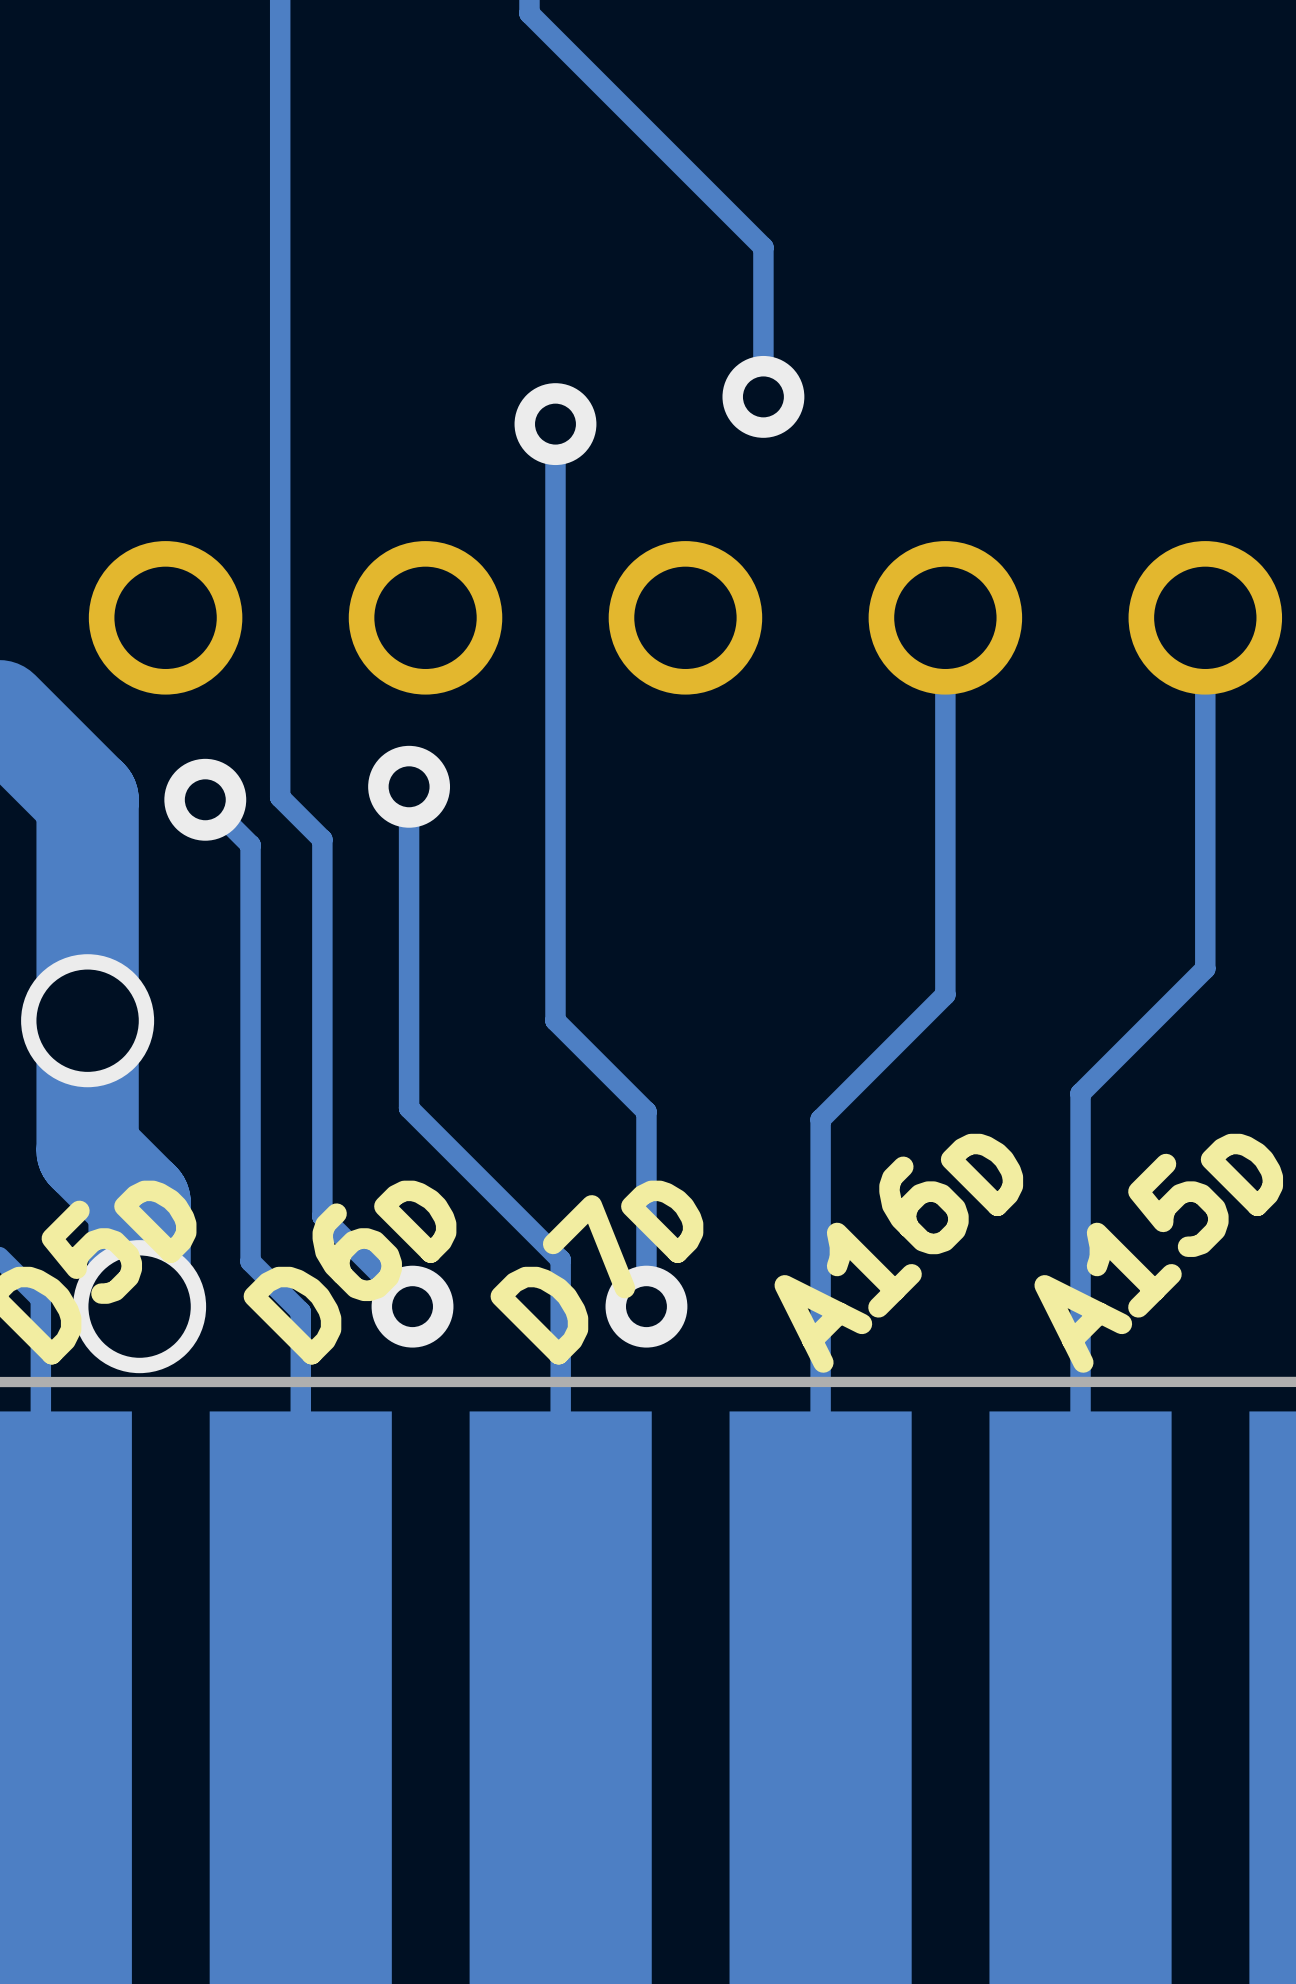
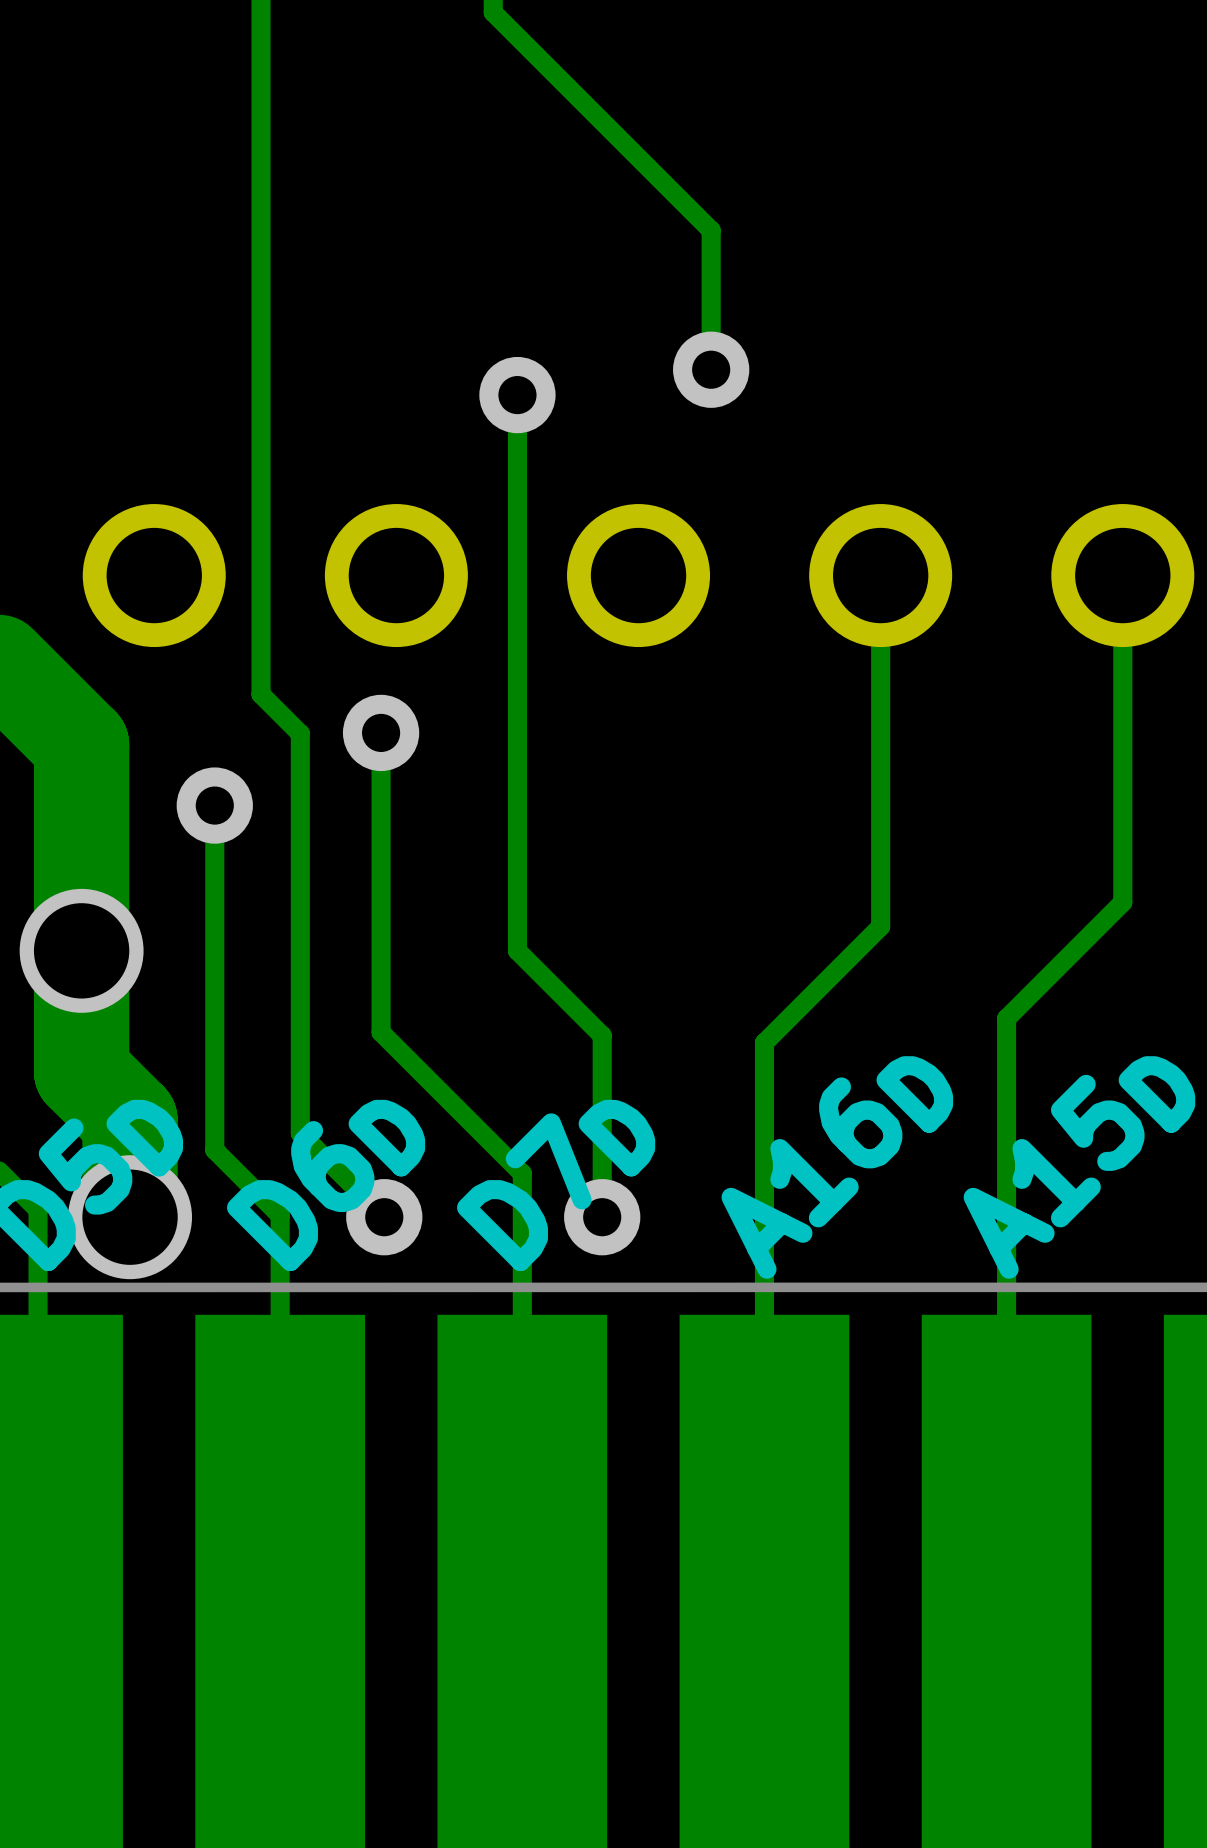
track: (280, 745) (280, 797) (322, 839) -> (261, 694) (300, 733) (300, 782)
track: (205, 799) (250, 845) (250, 1261) (300, 1311) -> (214, 805) (214, 1150) (280, 1215) (280, 1222)
via position: (205, 799) -> (214, 805)

